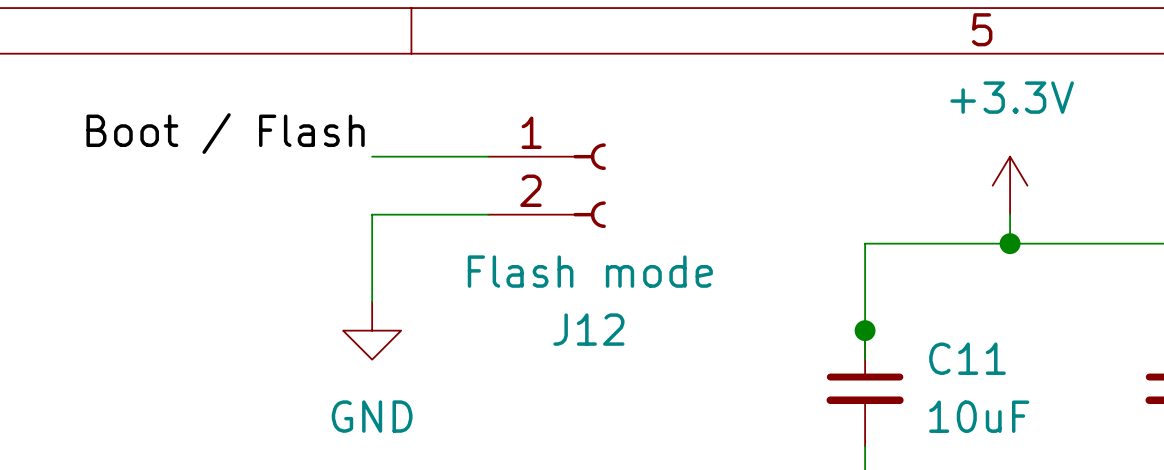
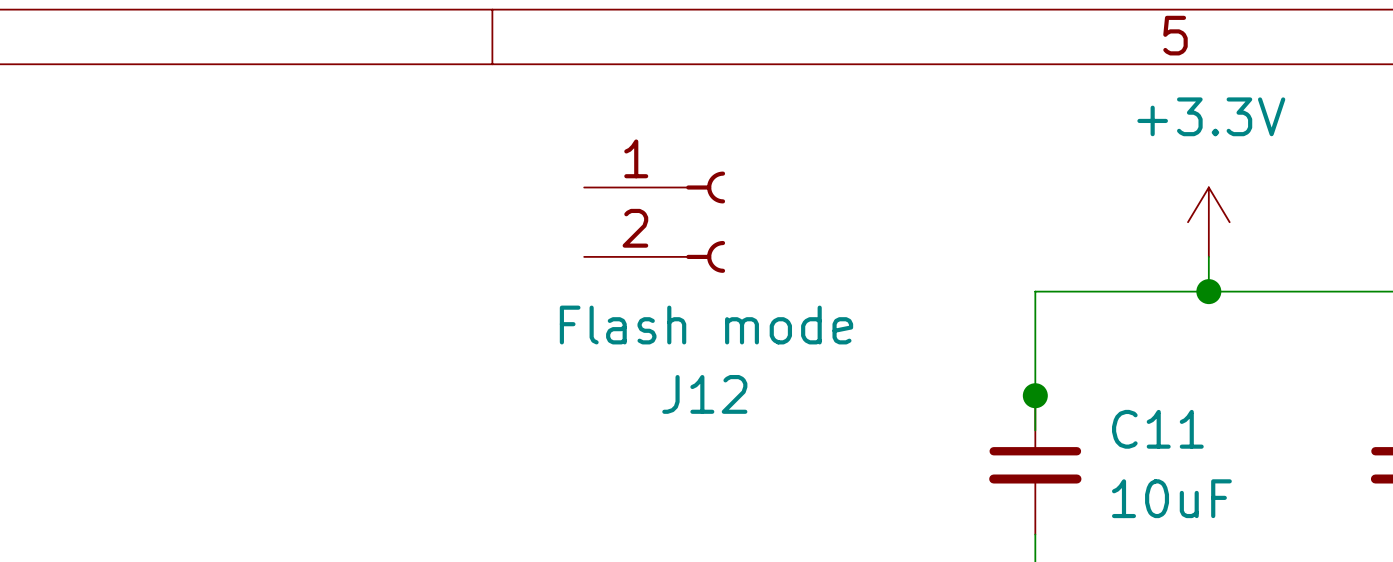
label: Boot / Flash (225, 133) -> none
wire: (372, 156) (488, 156) -> none
wire: (488, 214) (372, 214) (372, 301) -> none
power symbol: GND (372, 330) -> none

